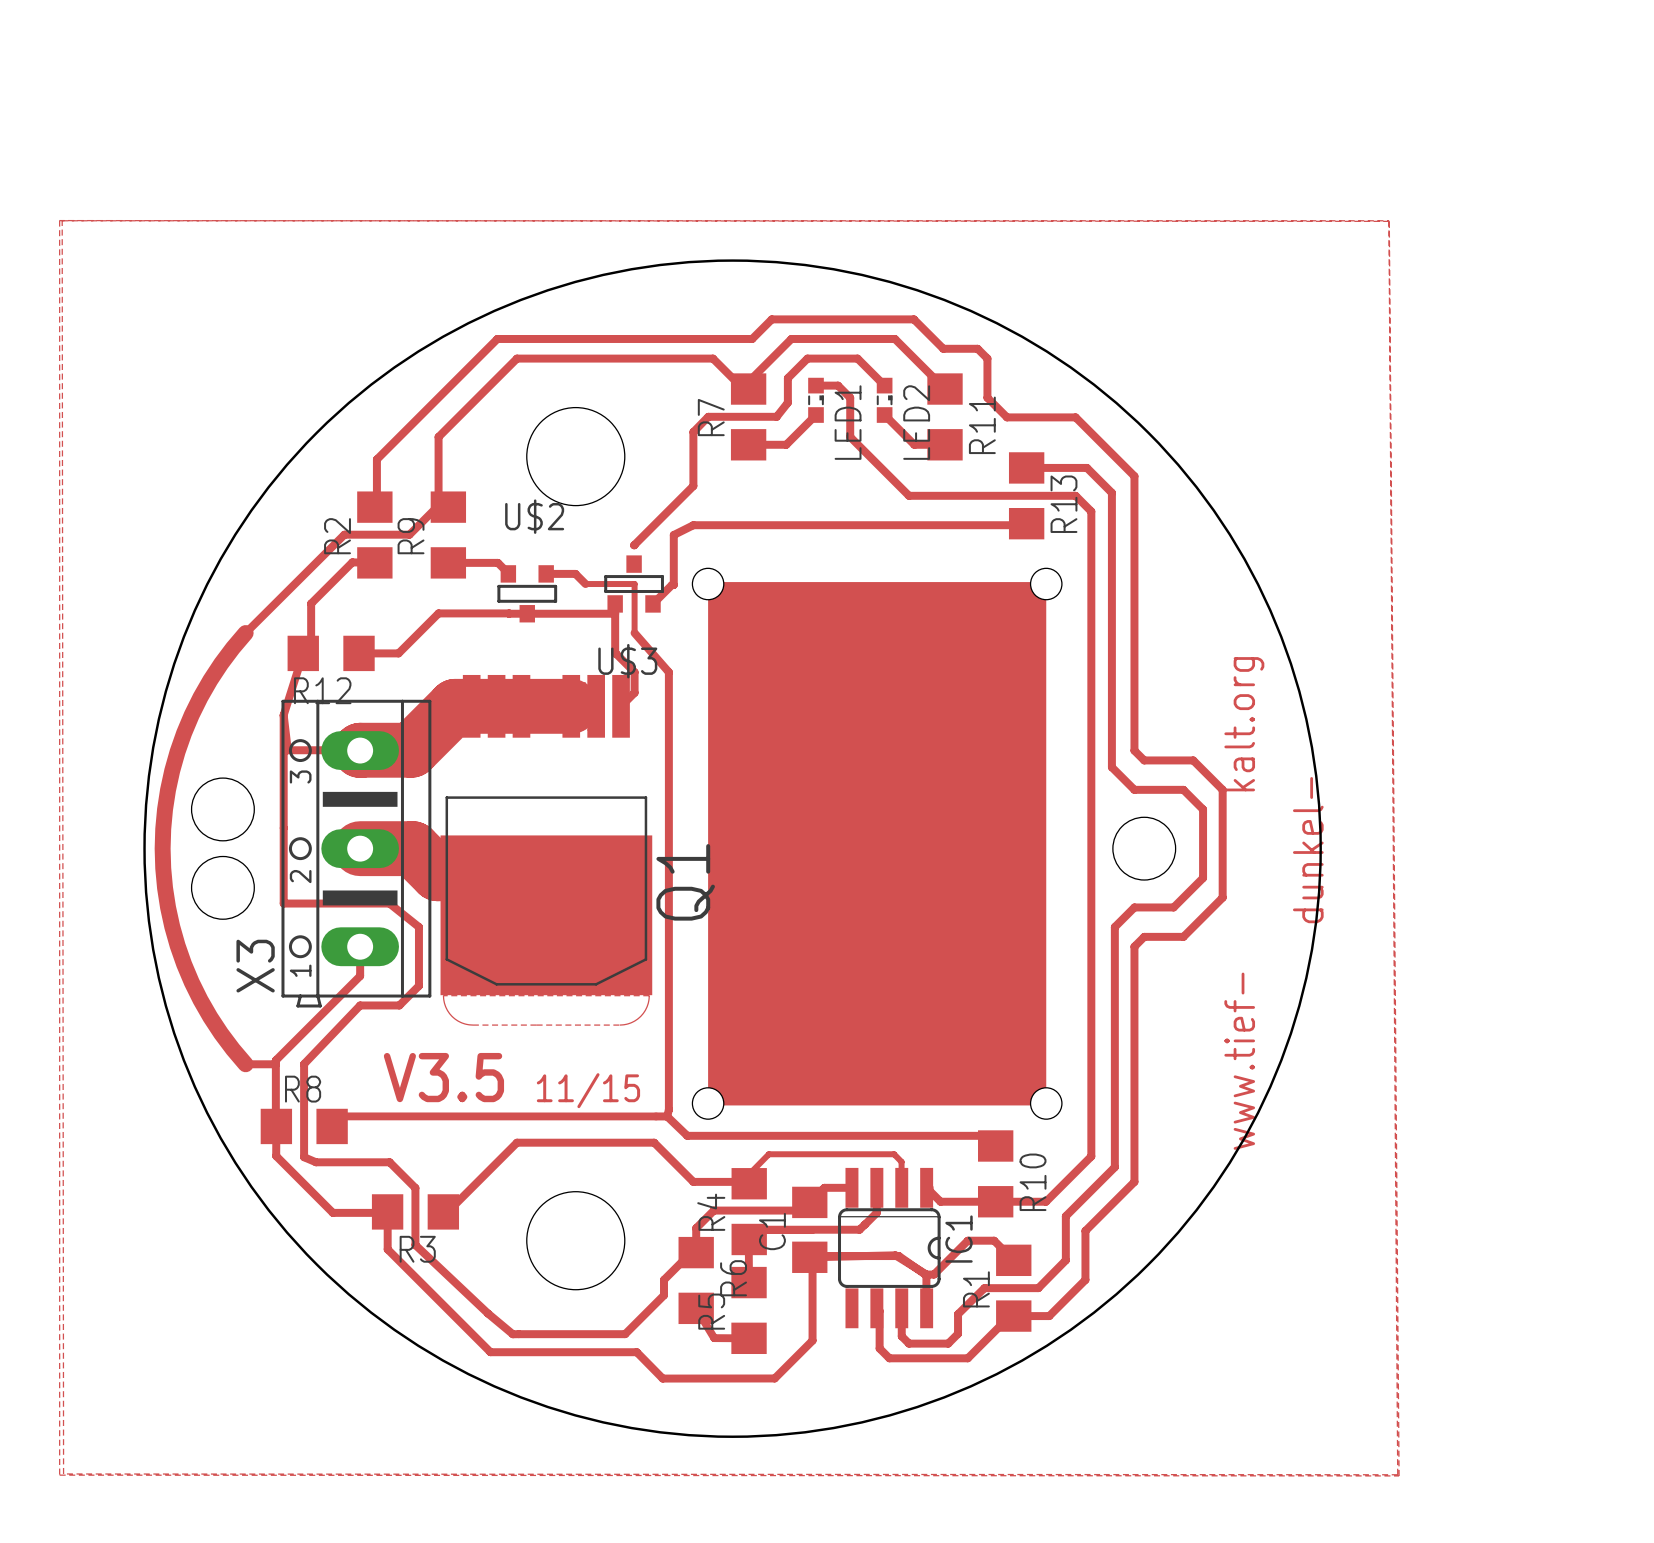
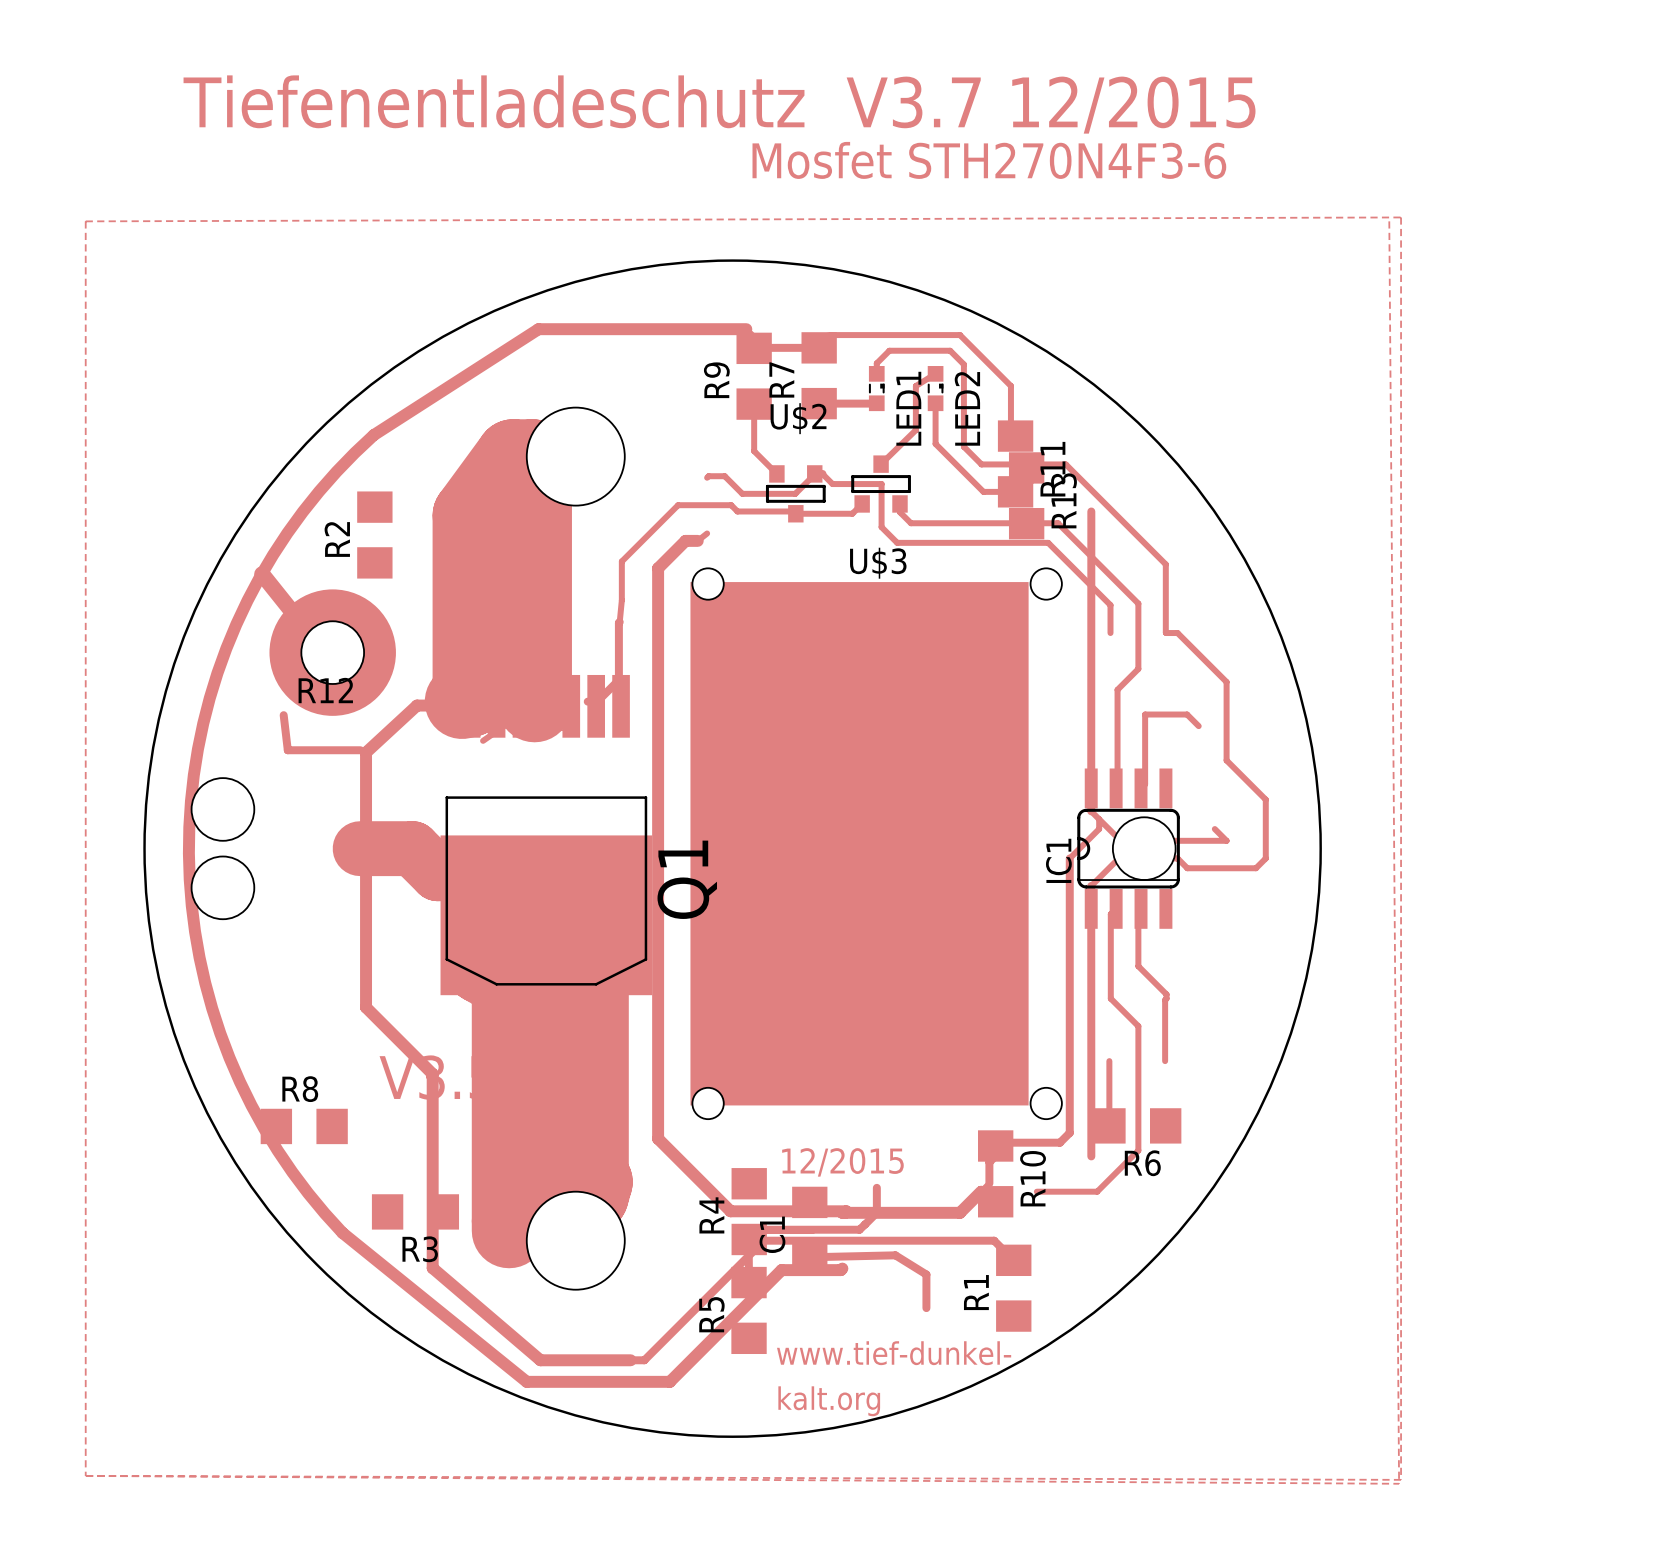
text: none -> Tiefenentladeschutz V3.7 12/2015 (719, 104)
text: none -> Mosfet STH270N4F3-6 (989, 160)
top zone outline: (62, 220) (1388, 220) (1397, 1474) (63, 1473) (62, 220) -> (85, 1475) (85, 221) (1401, 217) (1401, 1479) (85, 1475)
top zone outline: (1389, 221) (59, 220) (59, 1475) (1399, 1475) -> (85, 1475) (1399, 1483) (1399, 1475)
top track: none -> (763, 346) (746, 329) (538, 329) (373, 435) (354, 452) (302, 511) (273, 554) (236, 624) (217, 673) (203, 723) (190, 801) (188, 853) (191, 905) (205, 983) (229, 1057) (264, 1128) (292, 1172) (342, 1232) (526, 1381) (669, 1381) (781, 1270) (842, 1268)
top track: none -> (754, 347) (811, 347) (811, 358)
top track: none -> (819, 347) (819, 340) (805, 340) (830, 335) (959, 335) (1010, 386) (1010, 432) (1015, 436)
top track: none -> (876, 373) (876, 363) (889, 350) (950, 350) (963, 364) (963, 446) (981, 464) (1065, 464) (1165, 564) (1165, 632) (1177, 633) (1226, 682) (1226, 760) (1265, 799) (1265, 858) (1255, 868) (1187, 868) (1177, 858) (1118, 858) (1091, 885) (1091, 1156)
top track: none -> (935, 373) (915, 386) (915, 430) (881, 464)
top track: (816, 385) (838, 385) (850, 397) (850, 437) (909, 495) (1075, 495) (1091, 511) (1091, 1156) (1046, 1201) (940, 1201) (926, 1187) (929, 1187) -> none
top track: (884, 385) (857, 358) (807, 358) (787, 378) (787, 402) (776, 416) (708, 416) (693, 432) (693, 486) (634, 545) -> none
top track: (945, 389) (894, 338) (791, 338) (748, 381) (748, 389) (739, 397) (739, 385) (713, 358) (516, 358) (438, 437) (438, 505) (409, 534) (344, 534) (245, 633) (221, 663) (191, 714) (172, 770) (163, 828) (163, 868) (168, 907) (184, 964) (210, 1017) (245, 1064) (275, 1064) -> none
LED1 position: (816, 400) -> (876, 388)
LED2 position: (884, 400) -> (935, 388)
top track: none -> (876, 403) (819, 403)
top track: none -> (935, 403) (935, 443) (983, 491) (1015, 491)
top track: none -> (754, 404) (754, 451) (776, 473)
top track: (816, 415) (786, 444) (748, 444) -> none
top track: (884, 415) (914, 444) (945, 444) -> none
R7 position: (748, 416) -> (819, 375)
R11 position: (945, 416) -> (1015, 463)
top track: (1026, 467) (1086, 467) (1111, 492) (1111, 767) (1134, 789) (1183, 789) (1203, 809) (1203, 878) (1173, 907) (1134, 907) (1114, 927) (1114, 1167) (1065, 1216) (1065, 1260) (1038, 1288) (984, 1288) (958, 1314) (958, 1333) (948, 1343) (909, 1343) (901, 1336) (901, 1308) -> none
top track: none -> (707, 477) (724, 476) (742, 493) (795, 493) (814, 473) (822, 473) (832, 484) (881, 484) (881, 527) (897, 542) (1048, 542) (1110, 605) (1110, 633)
top track: none -> (862, 503) (852, 513) (737, 511) (731, 505) (678, 505) (621, 561) (618, 680) (597, 701) (587, 701)
top track: none -> (900, 503) (900, 512) (910, 523) (1058, 523) (1138, 603) (1138, 668) (1117, 689) (1116, 788)
top track: none -> (518, 505) (534, 501) (534, 704) (483, 740)
top track: none -> (518, 505) (532, 456) (513, 456) (469, 515) (469, 699) (462, 701)
top track: (374, 507) (376, 505) (376, 459) (497, 338) (752, 338) (771, 319) (913, 319) (943, 348) (977, 348) (987, 358) (987, 397) (1007, 417) (1075, 417) (1134, 476) (1134, 750) (1144, 760) (1193, 760) (1222, 789) (1222, 897) (1183, 936) (1144, 936) (1134, 946) (1134, 1181) (1085, 1230) (1085, 1279) (1049, 1316) (1010, 1316) (967, 1358) (889, 1358) (879, 1348) (879, 1311) (876, 1308) -> none
top track: none -> (1091, 511) (1091, 811) (1120, 840) (1226, 840) (1214, 829)
top track: (1026, 523) (1028, 523) (1026, 525) (693, 525) (673, 535) (673, 585) (653, 603) -> none
top track: none -> (707, 533) (697, 540) (685, 540) (658, 568) (658, 1138) (730, 1211) (846, 1211) (844, 1212)
R9 position: (448, 535) -> (754, 376)
top track: (374, 562) (352, 562) (311, 603) (311, 665) (303, 653) (283, 715) (283, 903) (389, 903) (418, 927) (418, 985) (399, 1005) (360, 1005) (304, 1064) (304, 1157) (316, 1162) (389, 1162) (415, 1188) (415, 1245) (512, 1334) (625, 1334) (663, 1295) (663, 1279) (691, 1252) (696, 1252) -> none
top track: (448, 562) (497, 562) (508, 573) -> none
top track: (546, 573) (575, 573) (585, 584) (634, 584) (634, 633) (668, 672) (668, 1109) (667, 1116) -> none
top track: none -> (262, 574) (293, 613)
U$3 position: (634, 584) -> (881, 484)
U$2 position: (527, 593) -> (795, 493)
top track: (615, 603) (615, 653) (634, 672) (634, 692) (621, 706) -> none
top track: (509, 613) (438, 613) (398, 653) (359, 653) -> none
top track: (509, 613) (615, 613) -> none
part: none -> (332, 652)
hole: none -> (332, 652)
top track: (571, 706) (455, 706) (411, 750) (360, 750) -> none
top track: none -> (1198, 726) (1187, 714) (1145, 714) (1145, 784) (1141, 788)
top track: none -> (1099, 819) (1099, 829) (1069, 858) (1069, 1132) (1059, 1142) (1009, 1142) (989, 1162) (989, 1183) (959, 1212) (842, 1212)
drawing position: (877, 843) -> (859, 843)
text: dunkel- (1308, 850) -> none
X3: (356, 853) -> none
top track: none -> (513, 902) (509, 906) (509, 1230) (509, 981) (481, 966) (520, 966) (530, 976) (556, 1181) (595, 1181) (591, 1195) (591, 985)
text: www.tief- kalt.org (1244, 903) -> none
top track: none -> (1116, 908) (1110, 914) (1110, 998) (1138, 1026) (1138, 1150) (1097, 1191) (1036, 1191)
top track: none -> (1141, 908) (1138, 911) (1138, 966) (1166, 994) (1165, 1061)
top track: (360, 946) (360, 976) (275, 1060) (276, 1156) (332, 1212) (389, 1212) (387, 1211) (387, 1249) (490, 1352) (636, 1352) (662, 1378) (774, 1378) (812, 1340) (812, 1257) (814, 1256) (898, 1256) (925, 1274) (933, 1274) (967, 1240) -> (456, 706) (460, 705) (417, 705) (366, 752) (366, 1007) (432, 1074) (432, 1268) (540, 1360) (644, 1360) (763, 1240) (967, 1240)
top zone outline: (443, 995) (445, 1006) (452, 1016) (461, 1022) (472, 1025) (623, 1024) (640, 1016) (647, 1006) (649, 995) (443, 995) -> none
top track: none -> (1109, 1061) (1109, 1125)
top track: (667, 1116) (330, 1116) (332, 1126) -> none
top track: (667, 1116) (687, 1135) (989, 1135) (995, 1145) -> none
text: none -> 12/2015 (842, 1162)
top track: (852, 1186) (824, 1187) (801, 1210) (713, 1210) (696, 1228) (696, 1252) -> none
top track: (901, 1187) (901, 1161) (894, 1154) (768, 1154) (749, 1174) (749, 1183) (747, 1181) (693, 1181) (654, 1142) (516, 1142) (447, 1211) (443, 1211) -> none
IC1 rotation: 0° (889, 1248) -> 180° (1128, 848)
IC1 position: (889, 1248) -> (1128, 848)
R6 rotation: 0° (696, 1280) -> 90° clockwise (1137, 1125)
R6 position: (696, 1280) -> (1137, 1125)
top track: (696, 1308) (714, 1338) (749, 1338) -> none
text: none -> www.tief-dunkel- (894, 1353)
text: none -> kalt.org (829, 1401)

